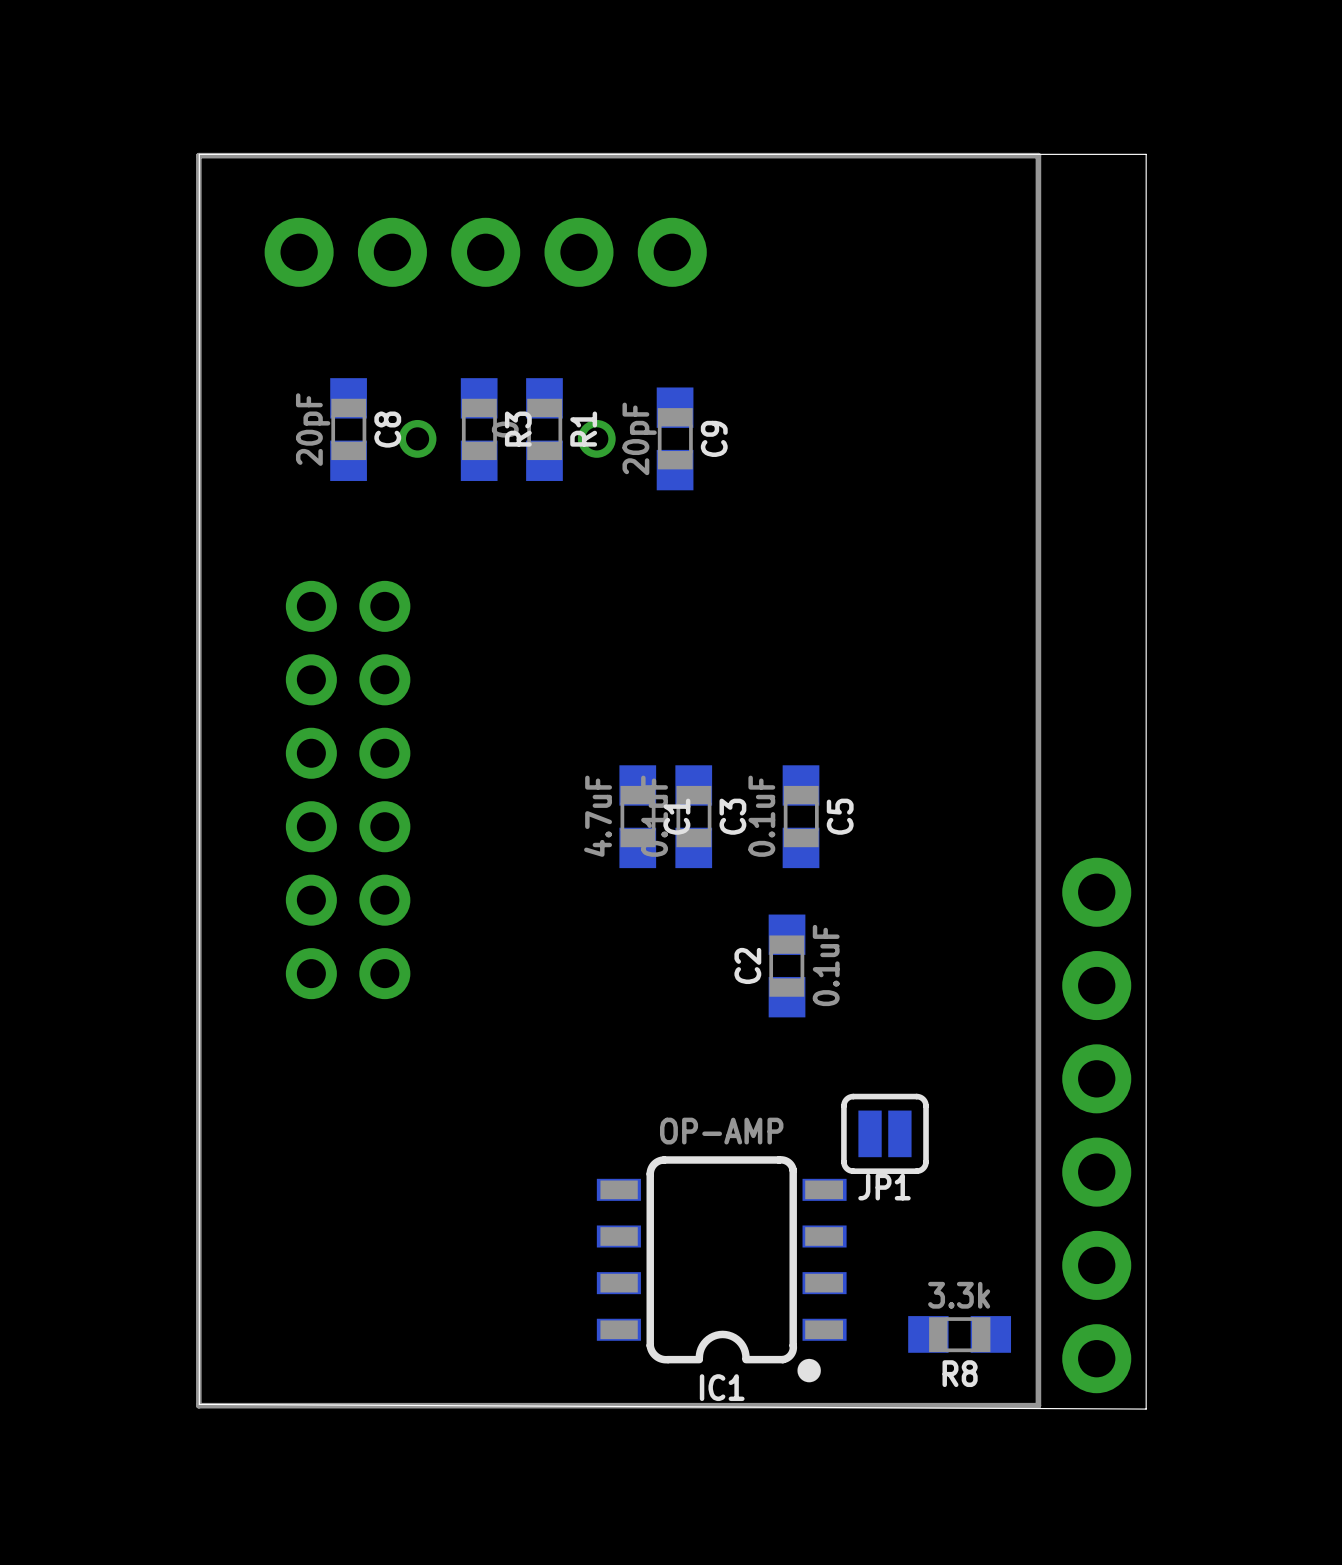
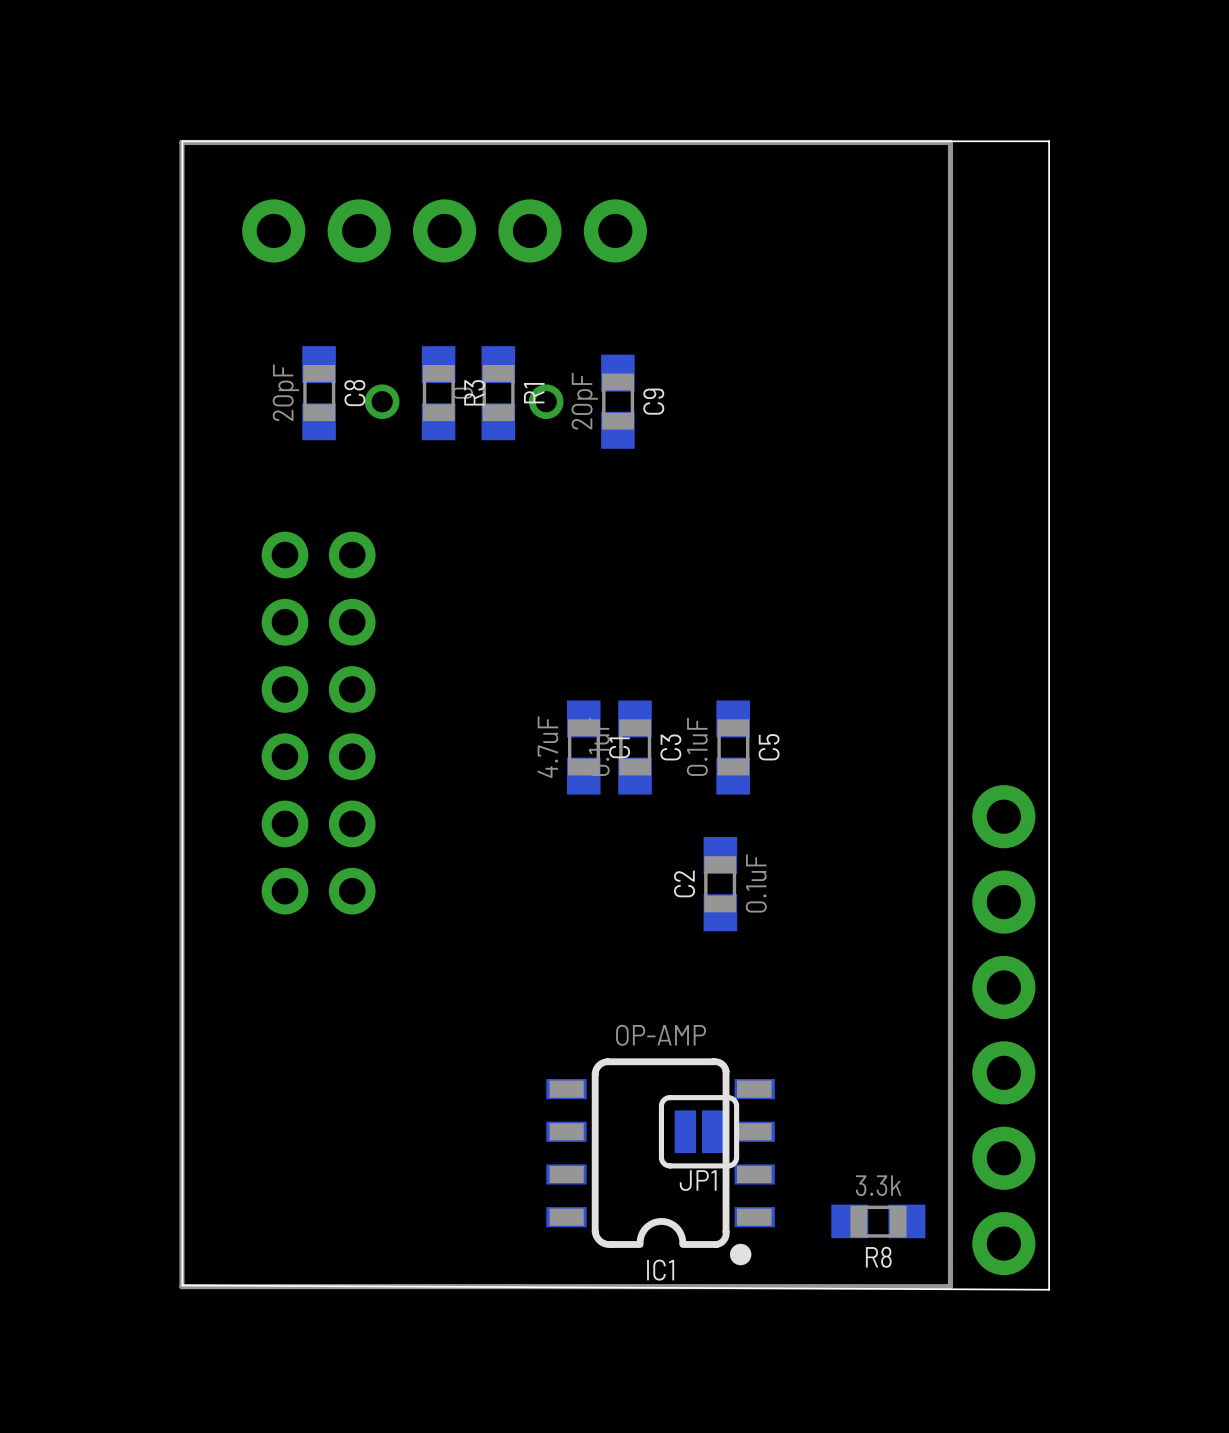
JP1 position: (884, 1133) -> (699, 1131)

